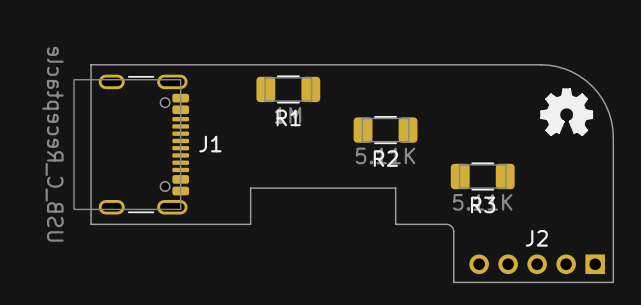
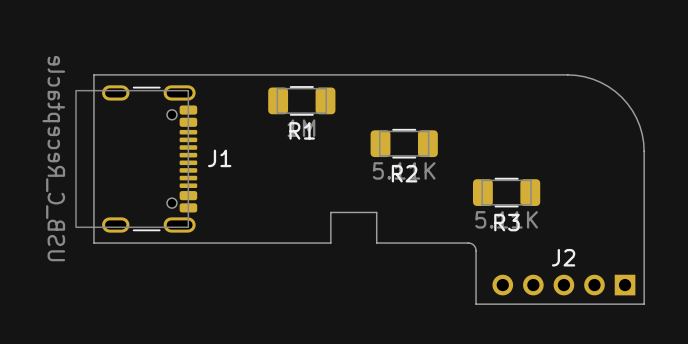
drawing: [540, 89, 593, 136] -> none
line: (569, 89) (563, 89) (561, 95) (557, 98) (550, 94) (546, 99) (549, 104) (547, 109) (540, 111) (541, 118) (547, 119) (549, 125) (546, 130) (550, 135) (556, 131) (559, 132) (563, 121) (560, 117) (559, 113) (563, 108) (569, 108) (573, 111) (573, 117) (569, 121) (574, 132) (577, 131) (582, 135) (587, 130) (583, 125) (585, 119) (592, 118) (592, 111) (585, 109) (583, 105) (587, 98) (582, 94) (576, 97) (571, 96) (569, 89) -> none
board edge: (395, 224) (395, 188) (250, 188) (250, 224) -> (414, 243) (376, 243) (376, 212) (330, 212) (330, 243) (262, 243)

